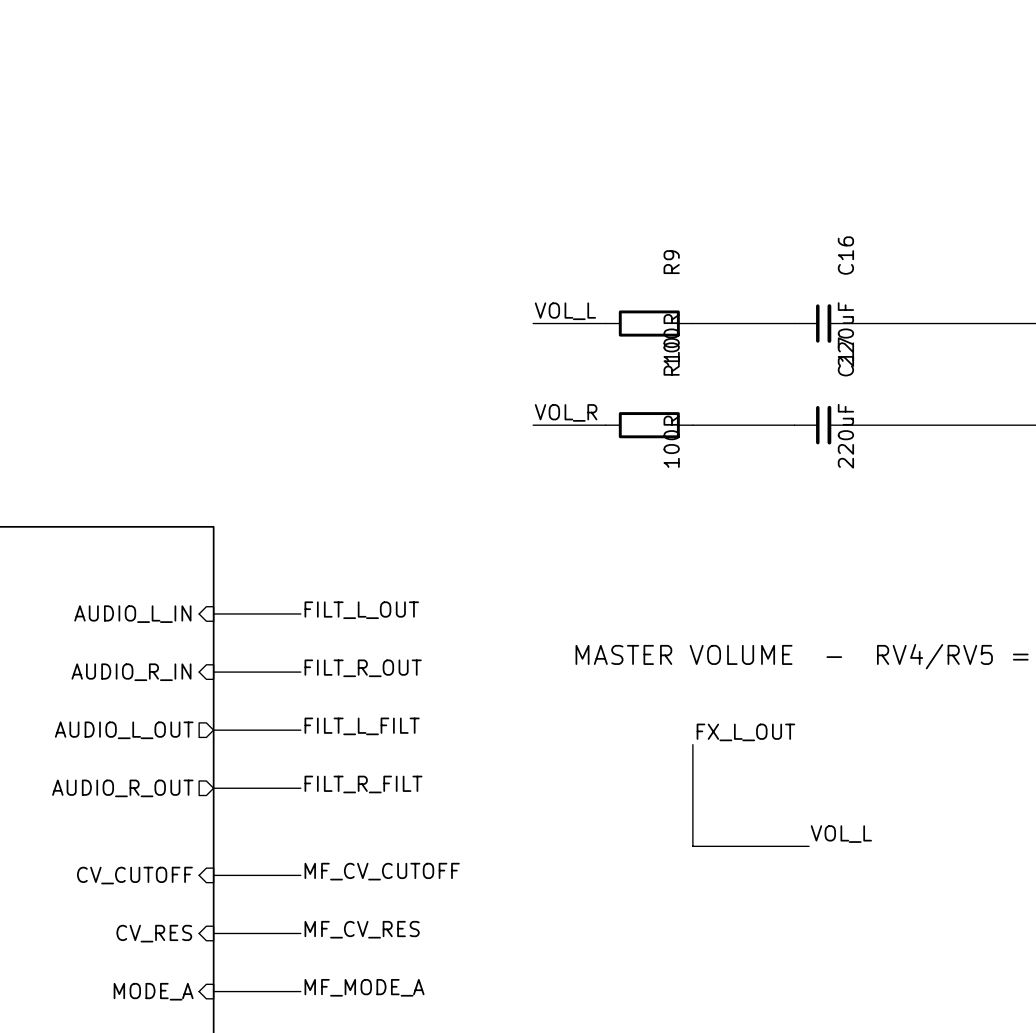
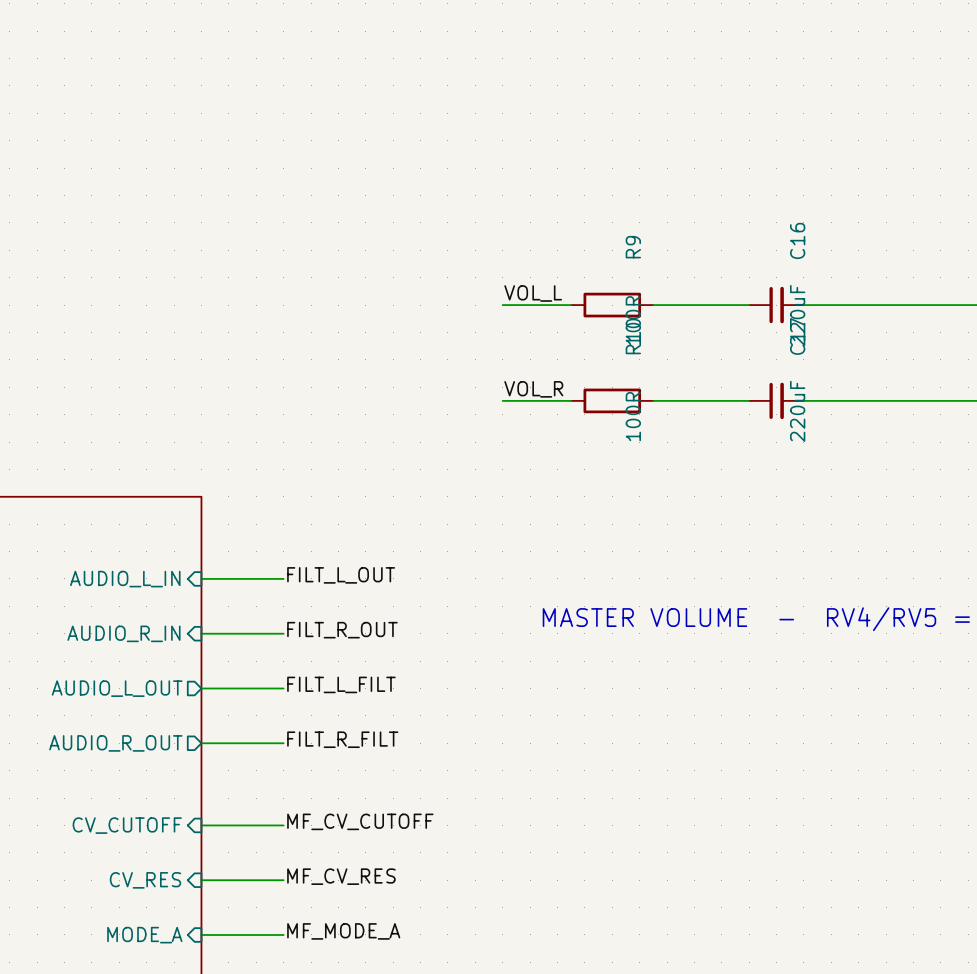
label: FX_L_OUT (745, 732) -> none
wire: (692, 744) (692, 846) (809, 846) -> none
label: VOL_L (841, 834) -> none

